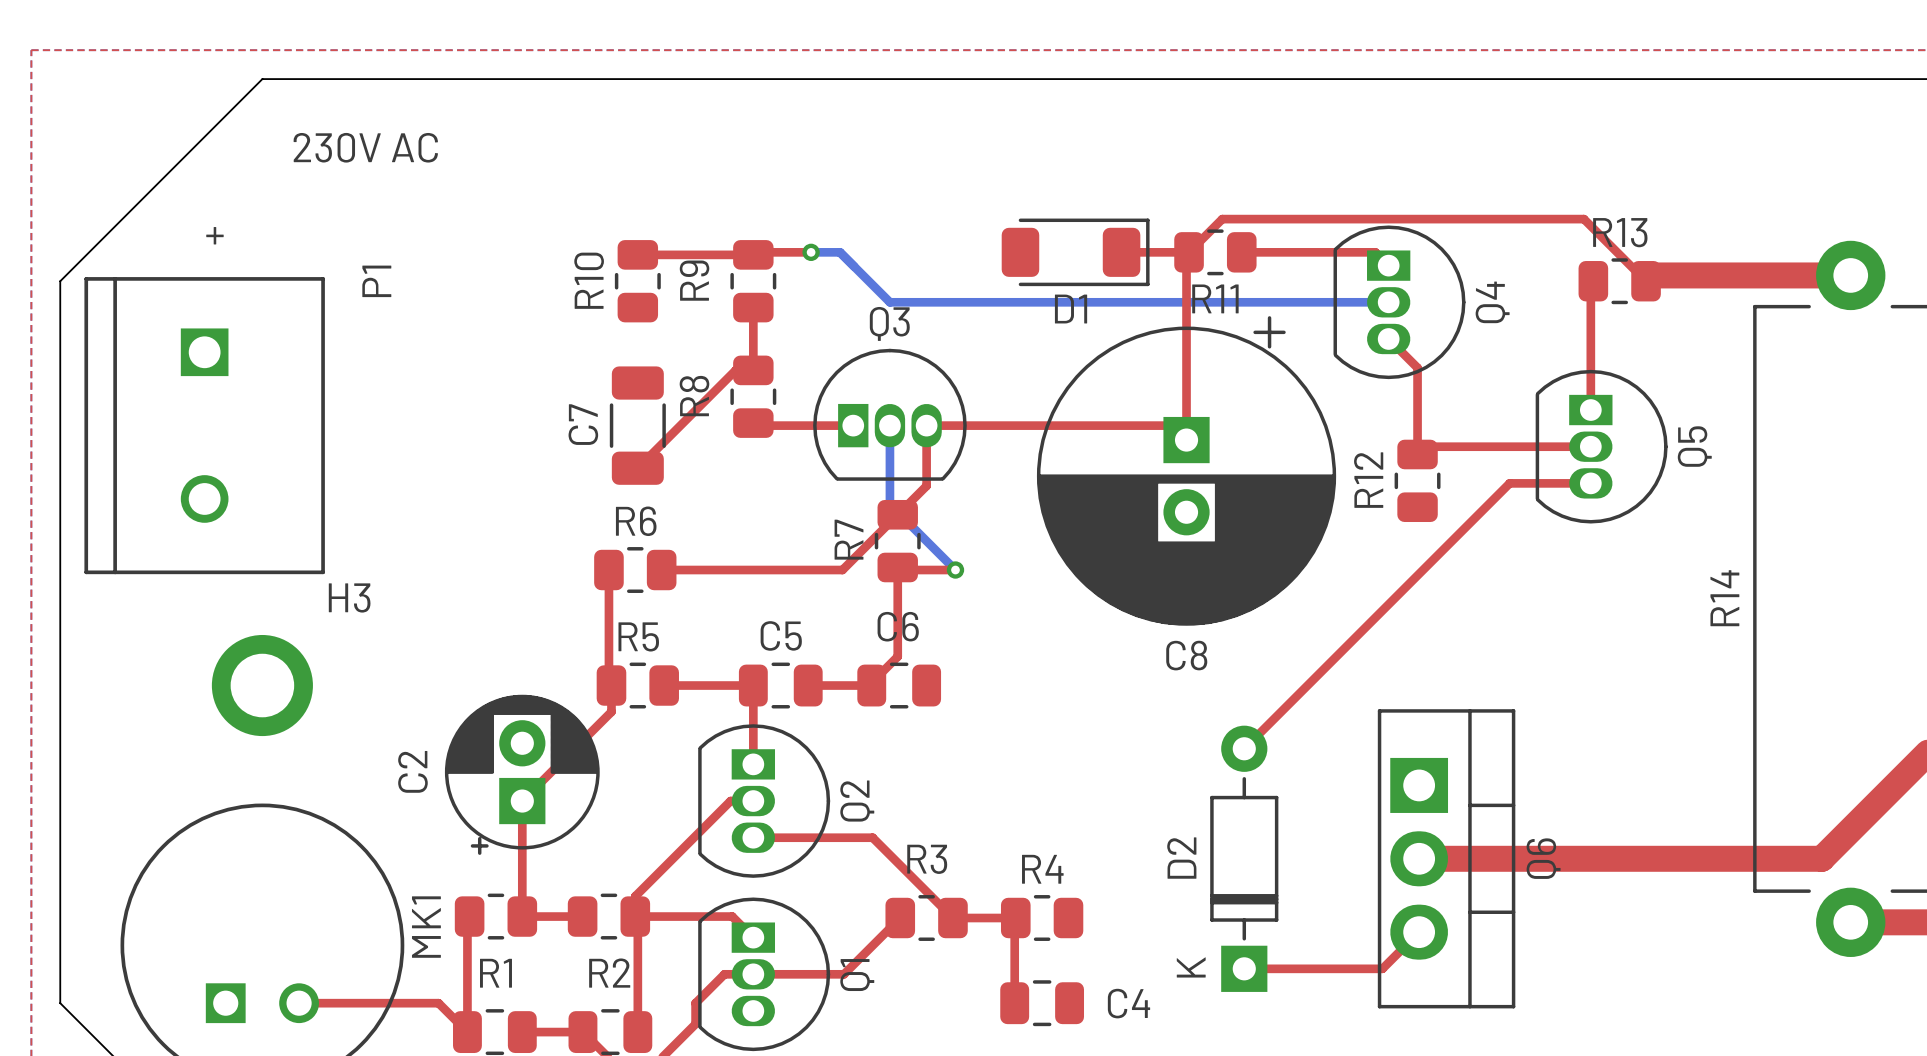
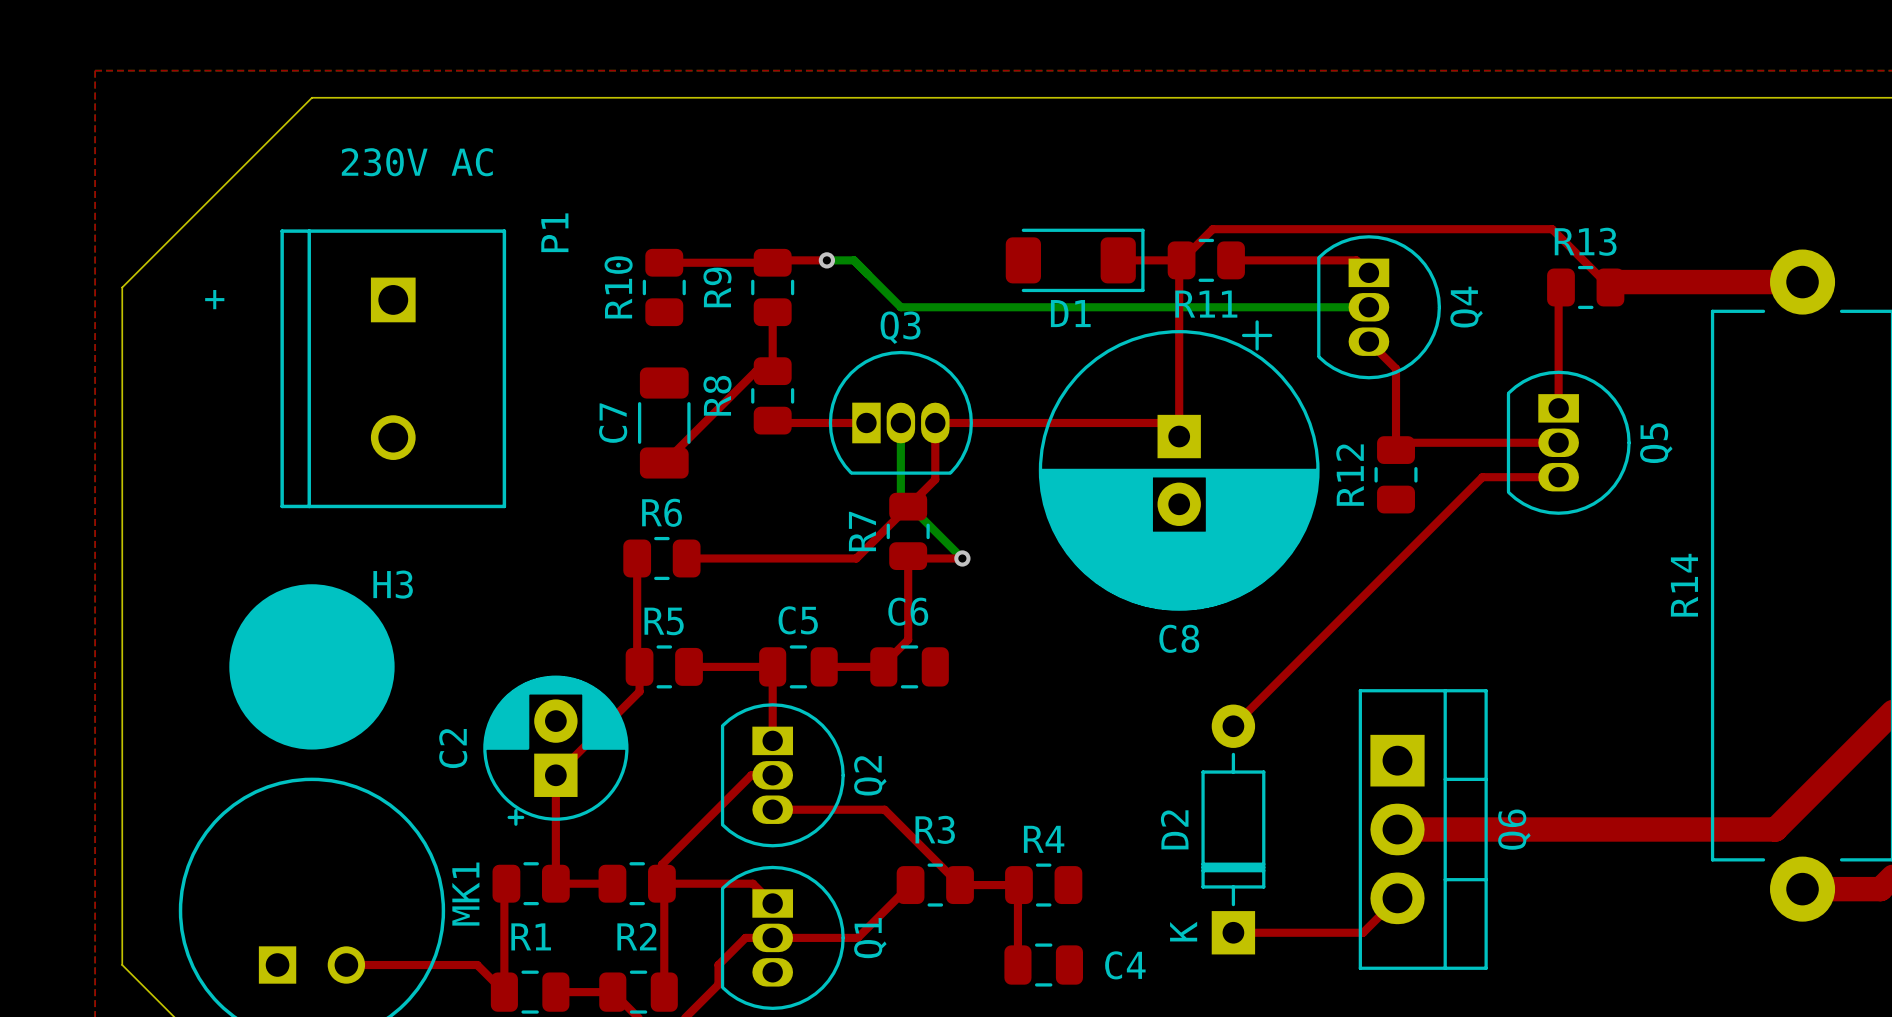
text position: + (214, 235) -> + (214, 299)
P1 position: (204, 425) -> (393, 368)
drawing: none -> [229, 584, 395, 750]

